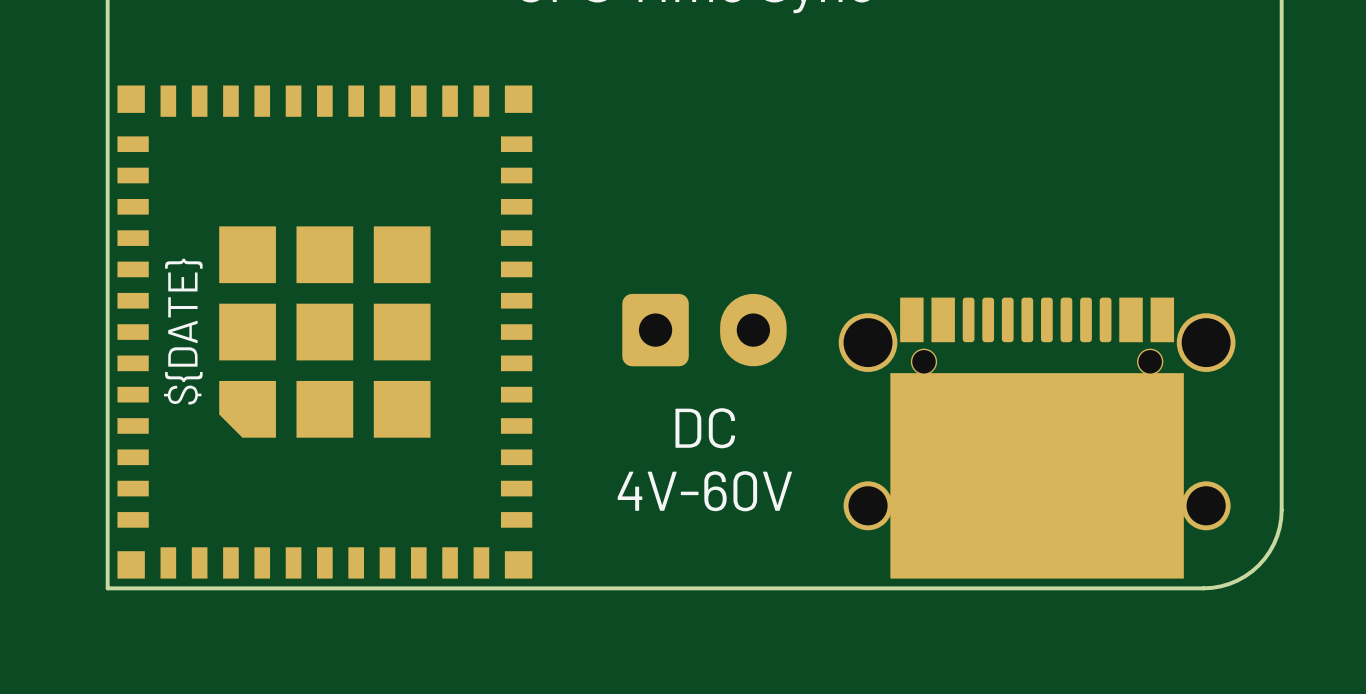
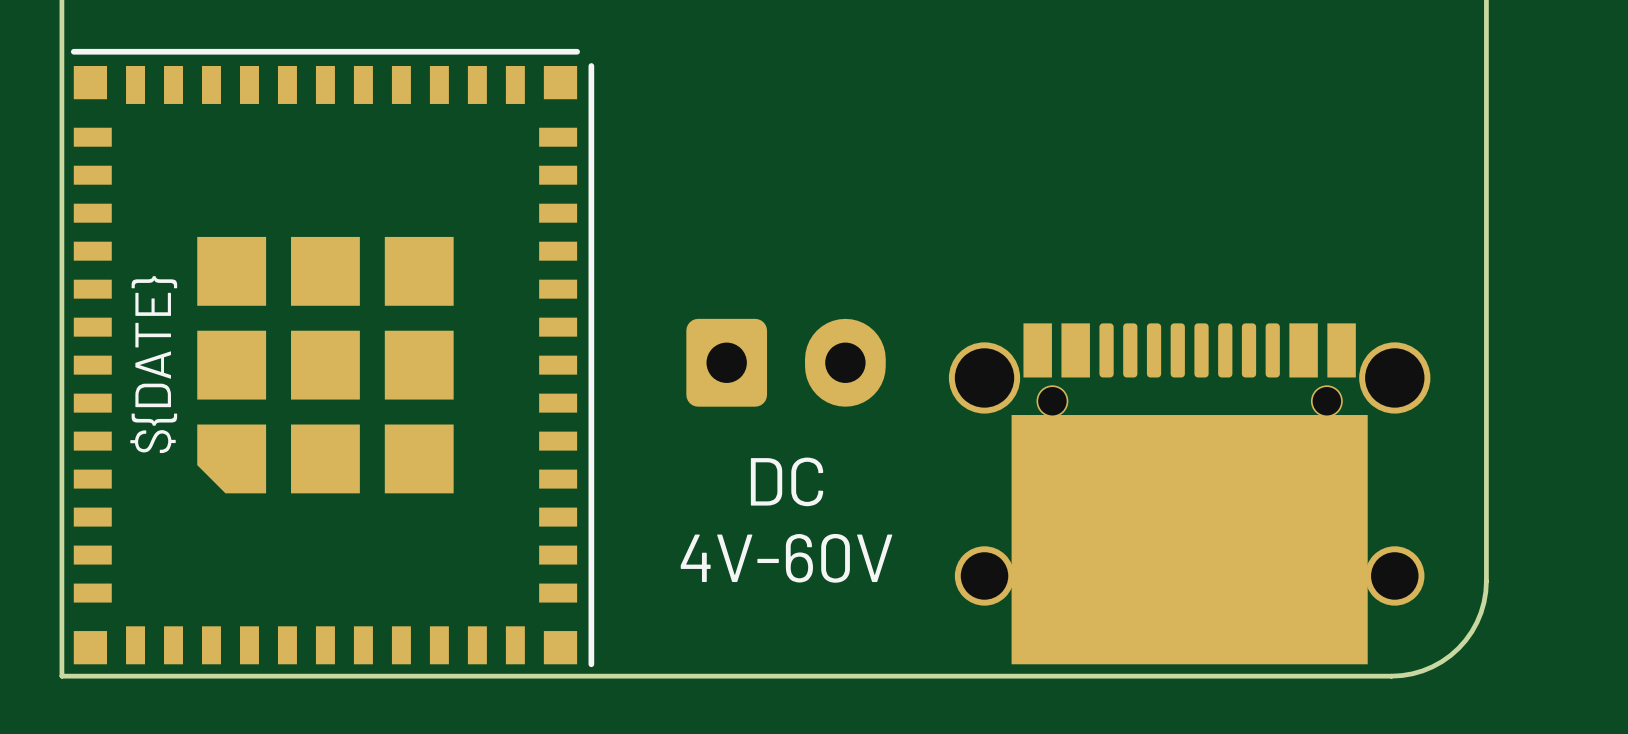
part footprint: [117, 85, 533, 579] -> [70, 48, 595, 668]

